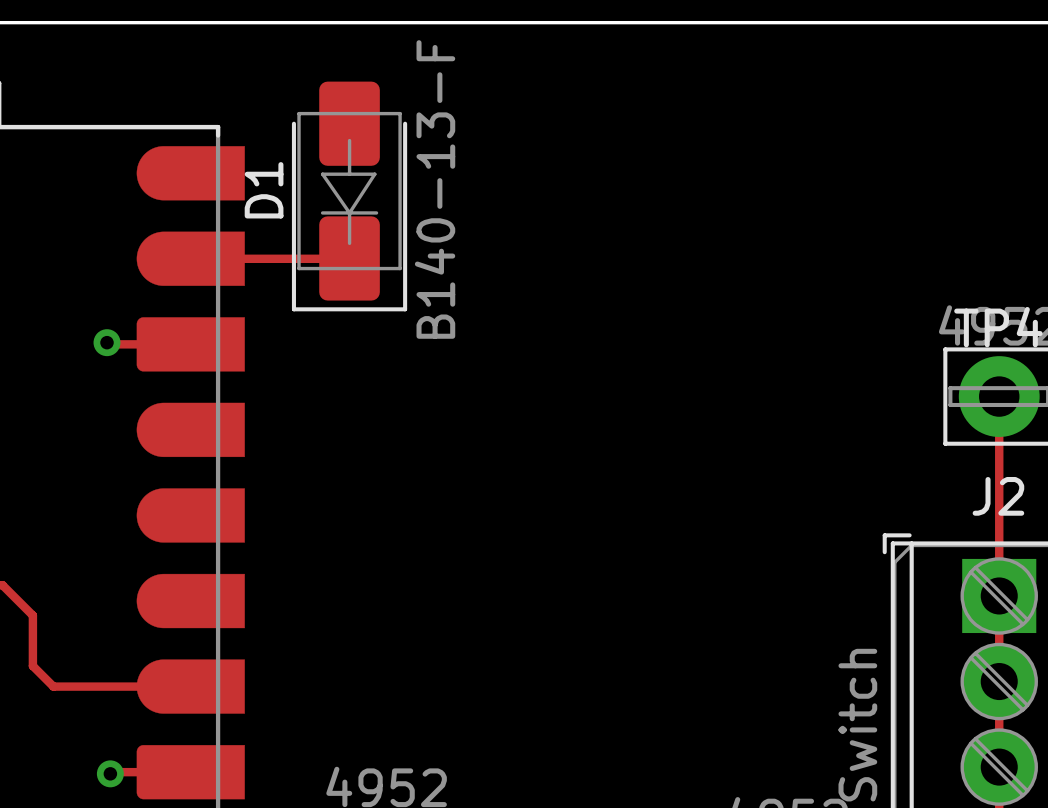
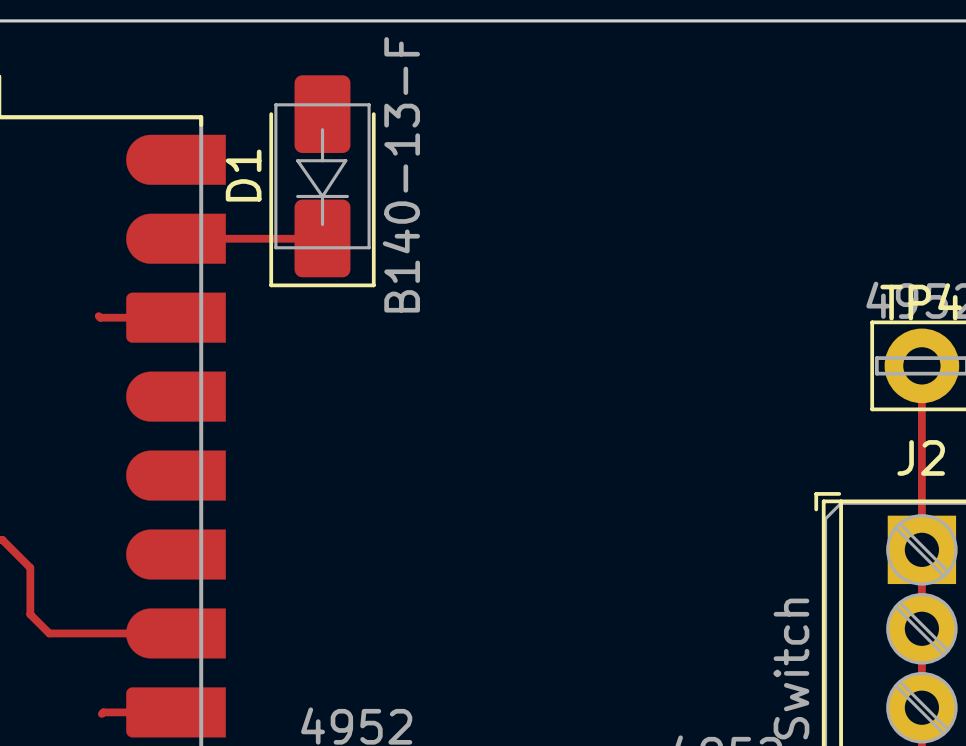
via: (107, 342) -> none
via: (110, 773) -> none

